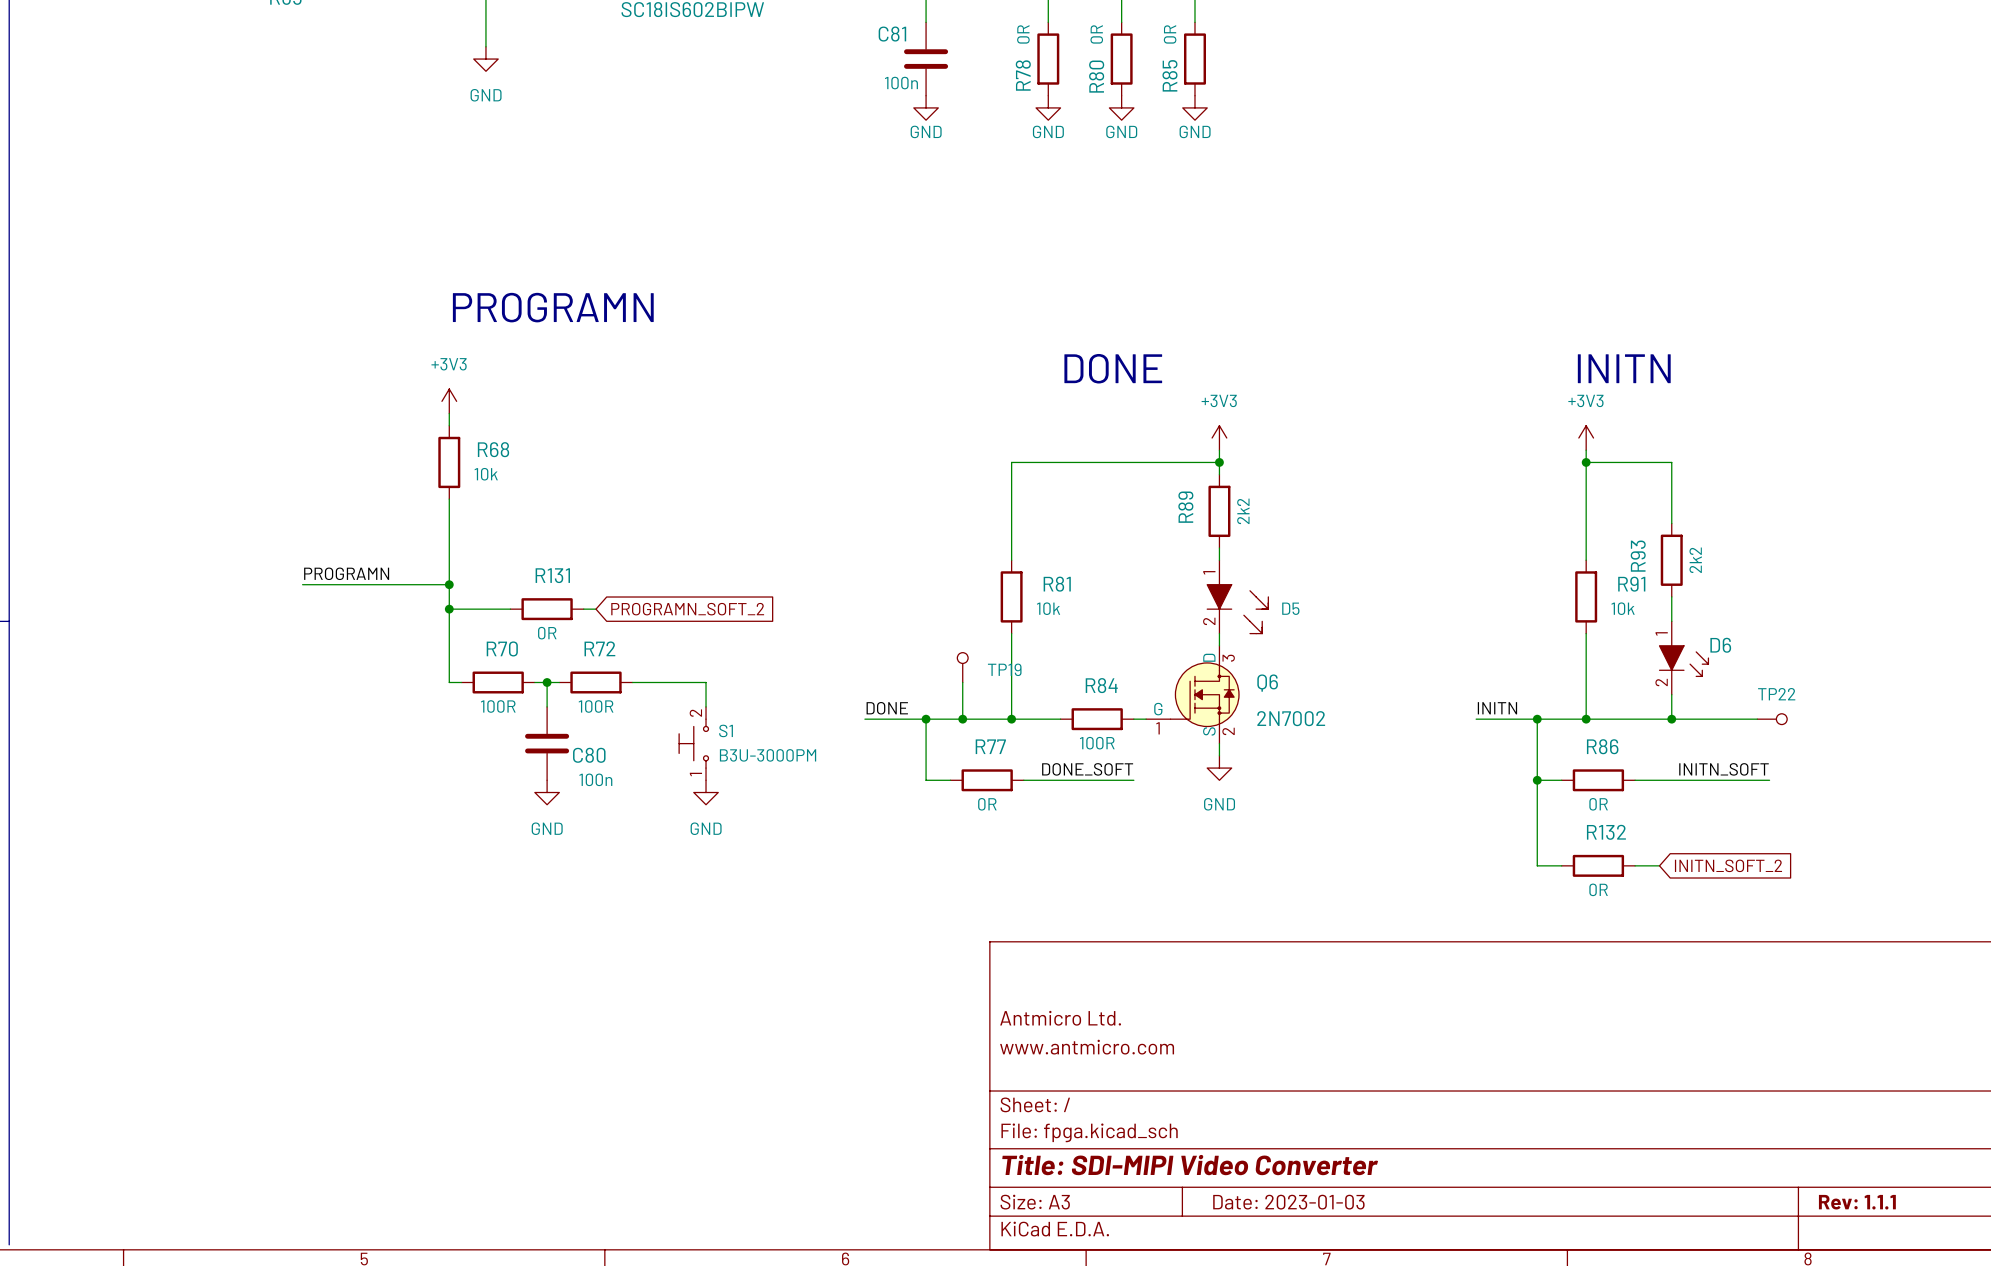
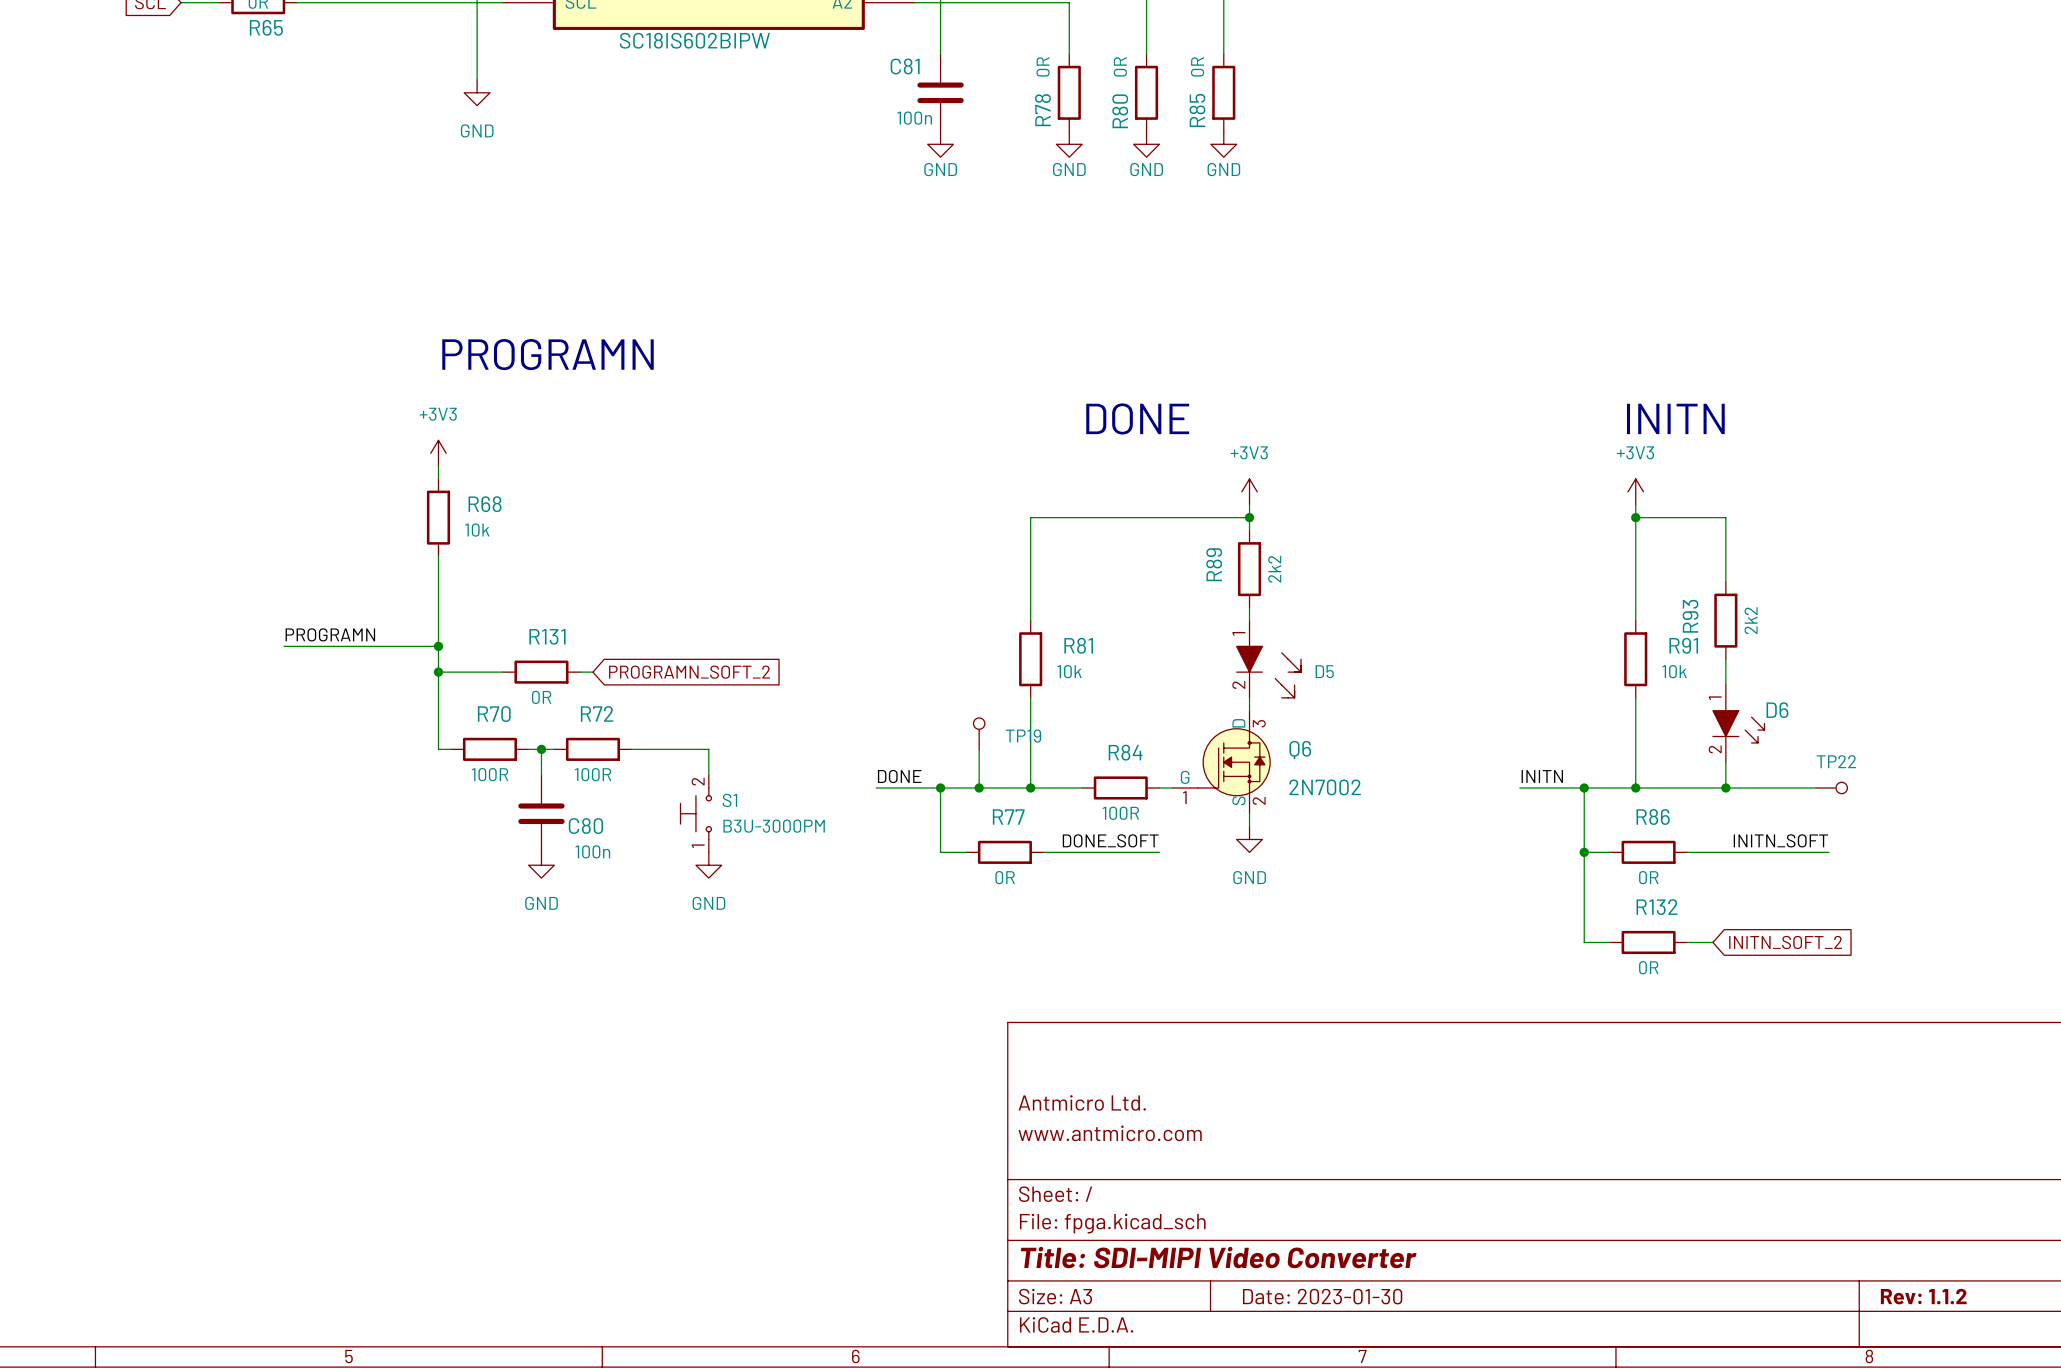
title block: Date: 2023-01-03 (1288, 1202) -> Date: 2023-01-30 (1322, 1296)
title block: Rev: 1.1.1 (1857, 1202) -> Rev: 1.1.2 (1923, 1296)

